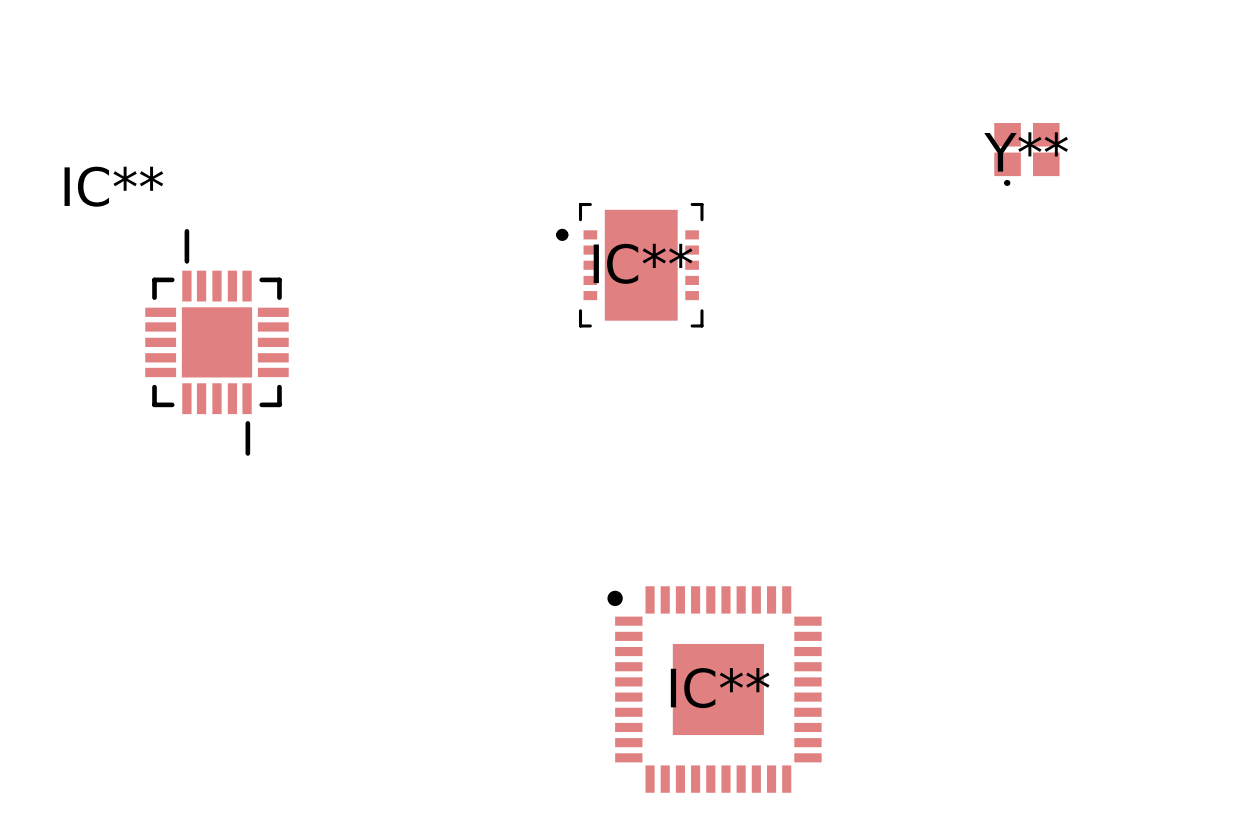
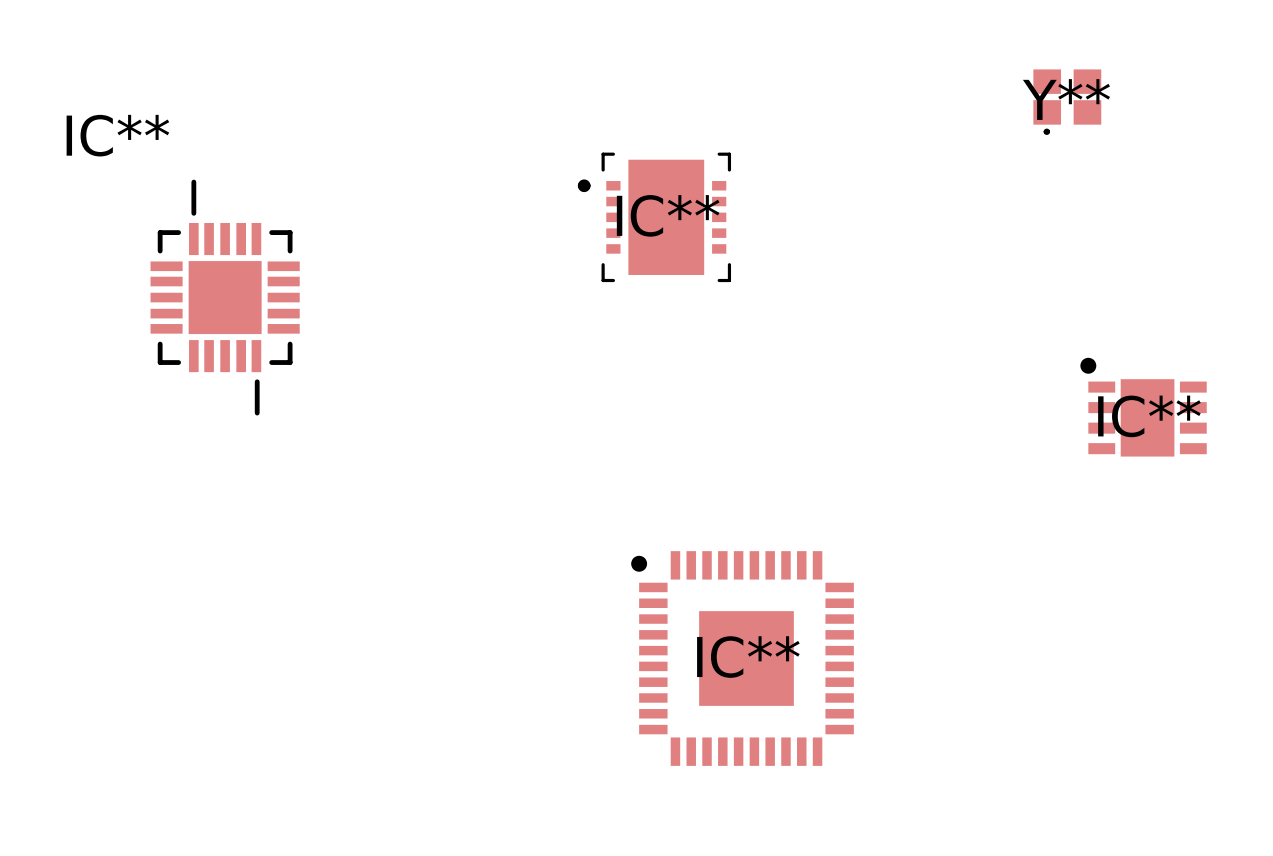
IC**: none -> (1143, 407)

